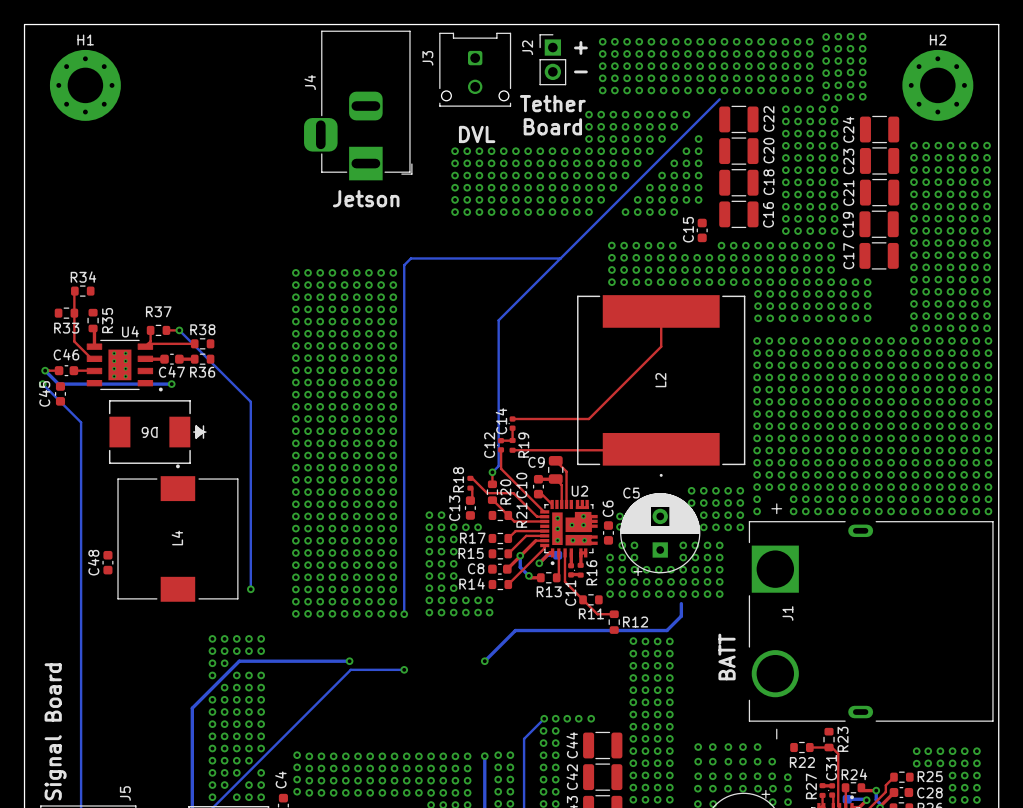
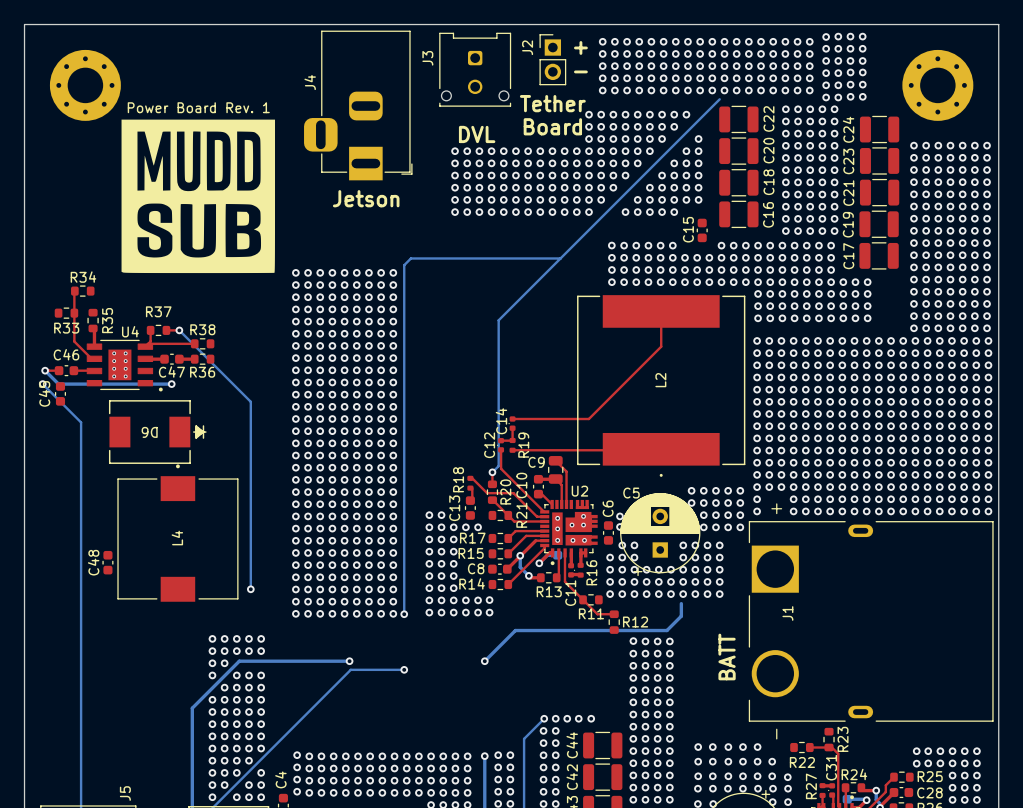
H1 name: H1 (85, 39) -> none
H2 name: H2 (938, 39) -> none
text: none -> Power Board Rev. 1 (198, 107)
drawing: none -> [121, 119, 276, 274]
text: Signal Board (55, 731) -> none

